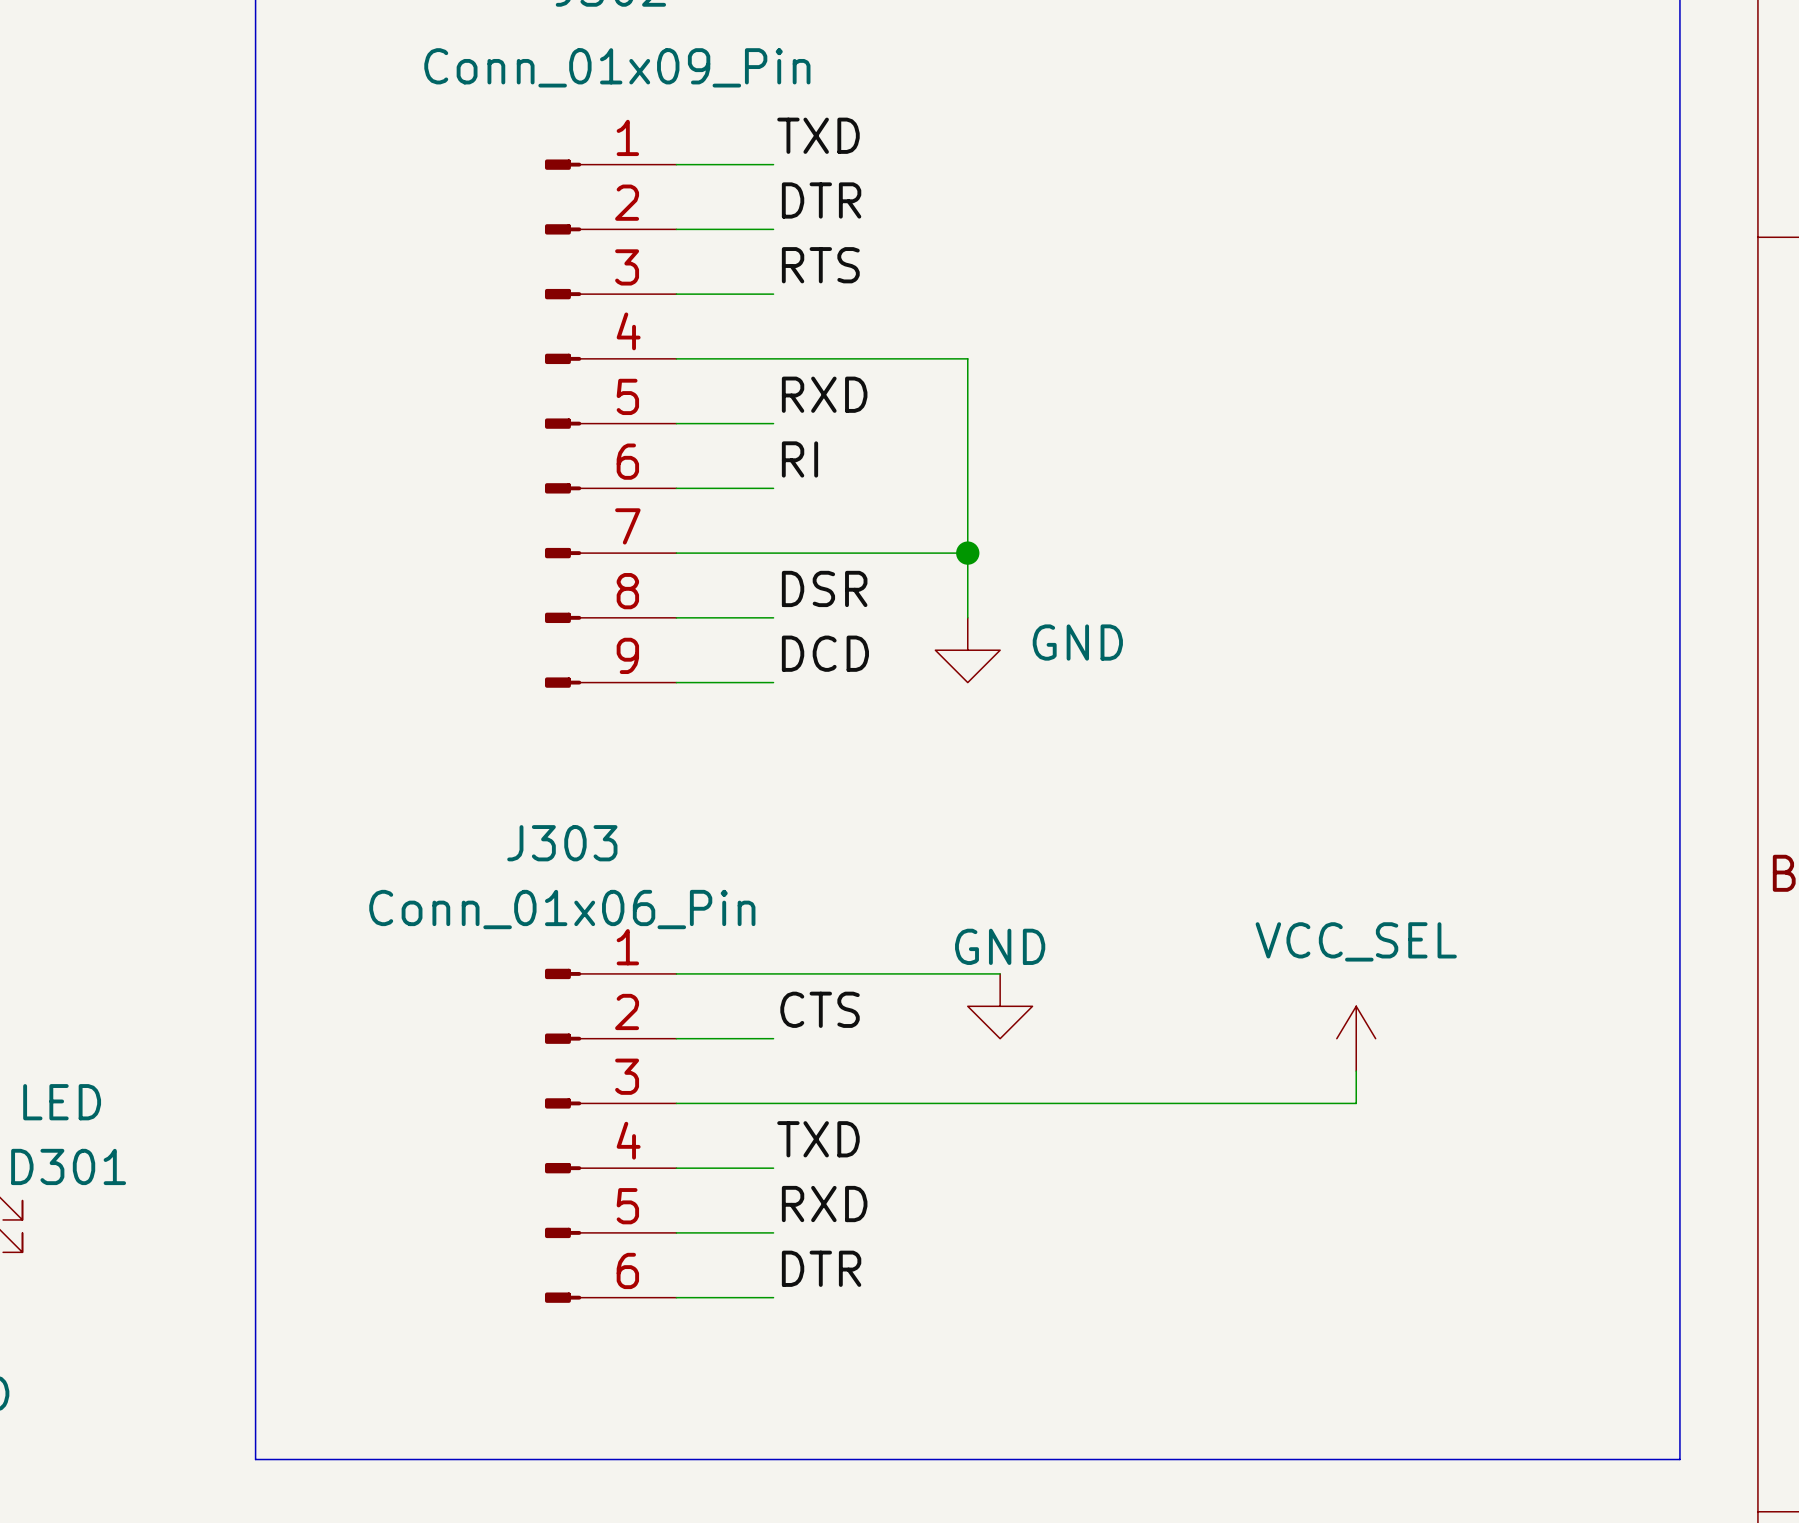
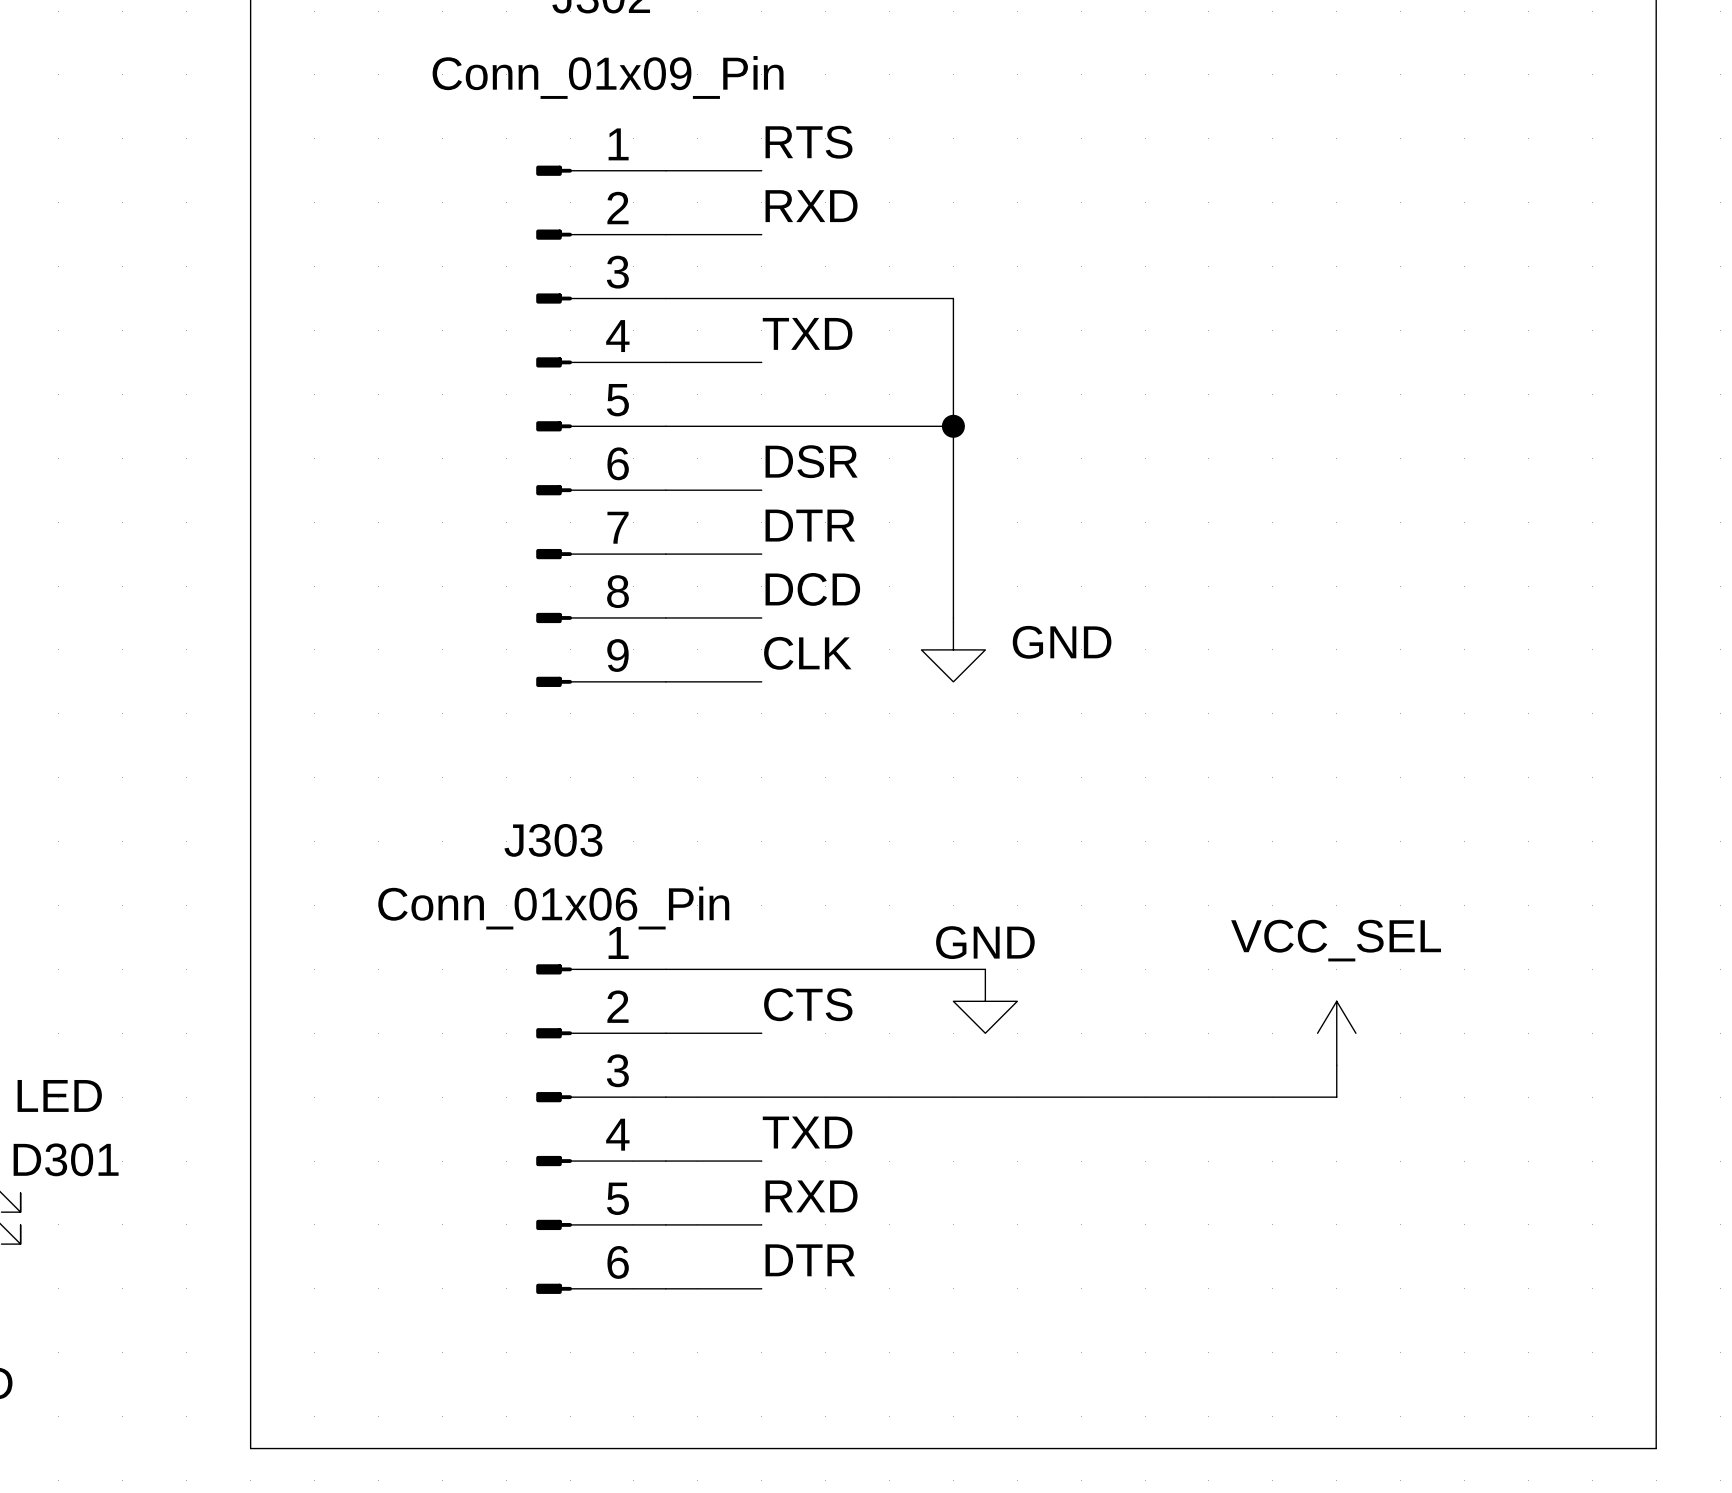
label: TXD (818, 135) -> RTS (809, 142)
label: DTR (821, 200) -> RXD (811, 206)
label: RTS (820, 265) -> none
wire: (773, 358) (967, 358) -> (761, 298) (953, 298) (953, 362)
label: RXD (824, 394) -> TXD (807, 333)
label: RI (799, 459) -> DSR (811, 461)
label: none -> DTR (810, 525)
wire: (773, 553) (967, 553) -> (761, 426) (953, 426)
junction position: (967, 553) -> (953, 426)
label: DSR (824, 588) -> DCD (812, 589)
label: DCD (825, 653) -> CLK (807, 653)

